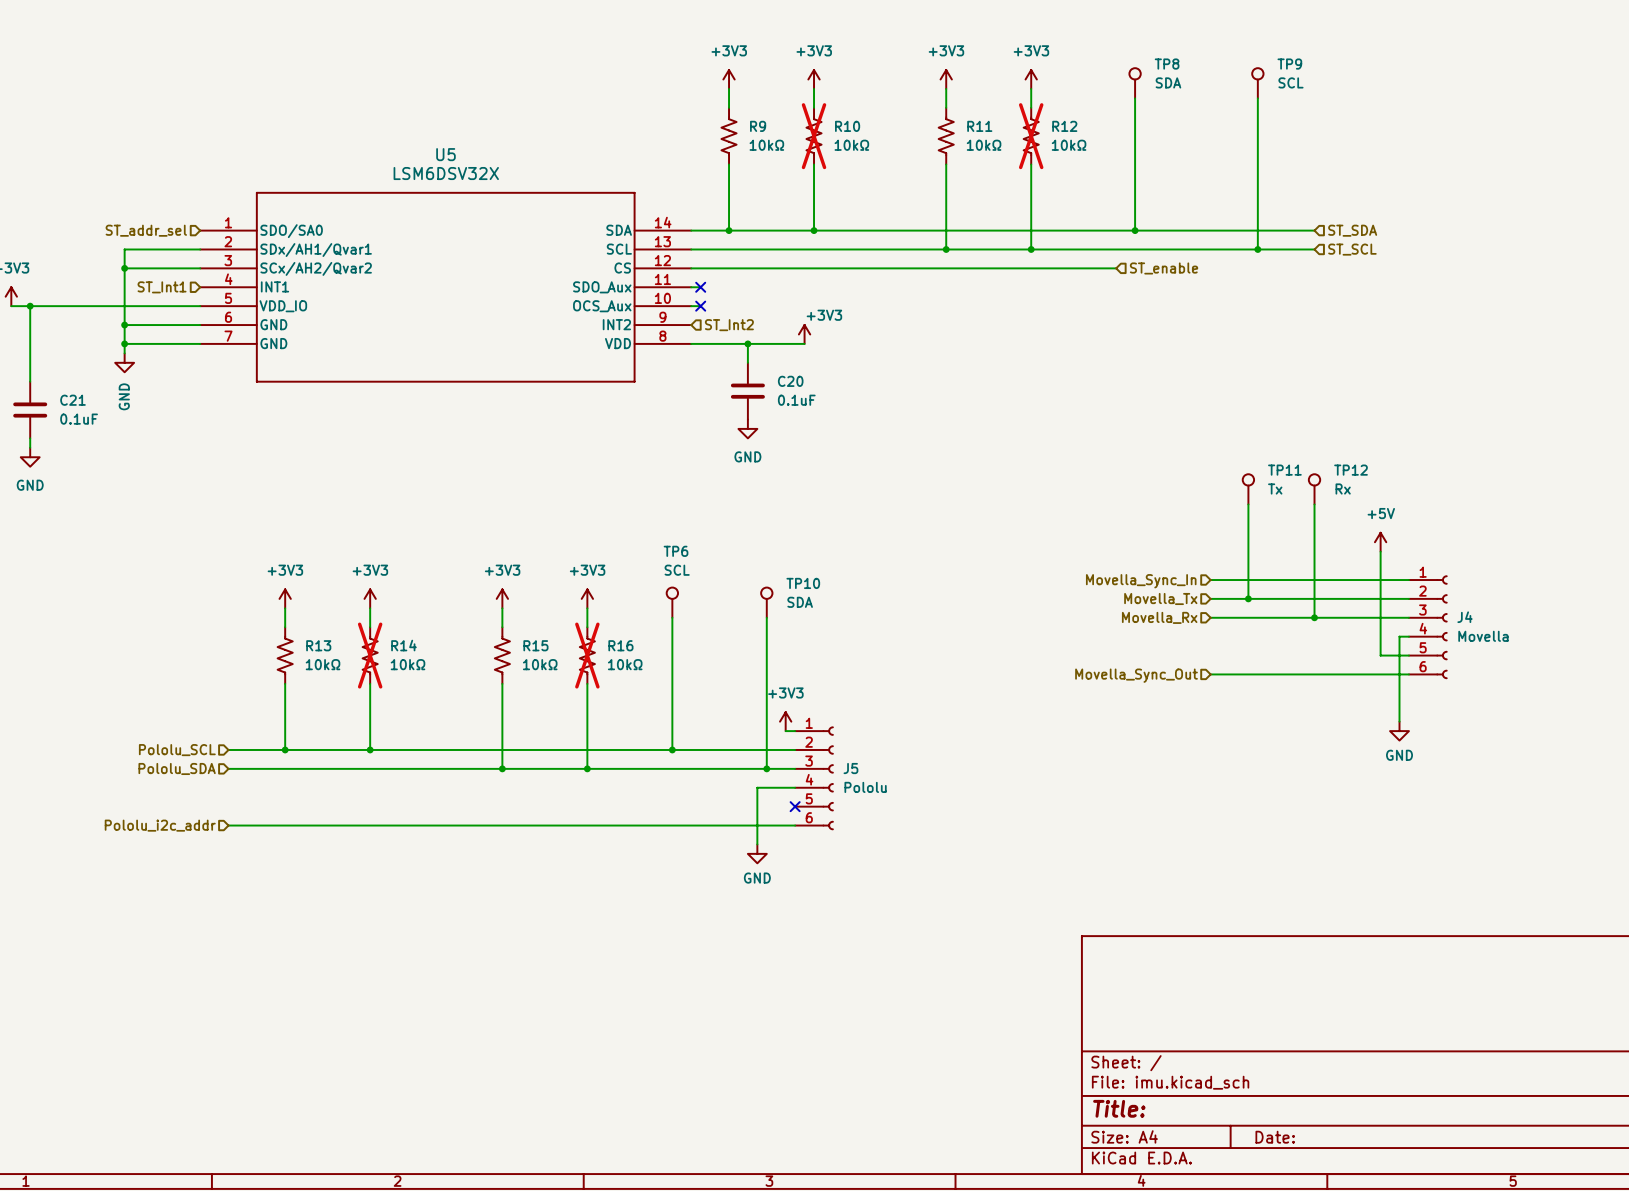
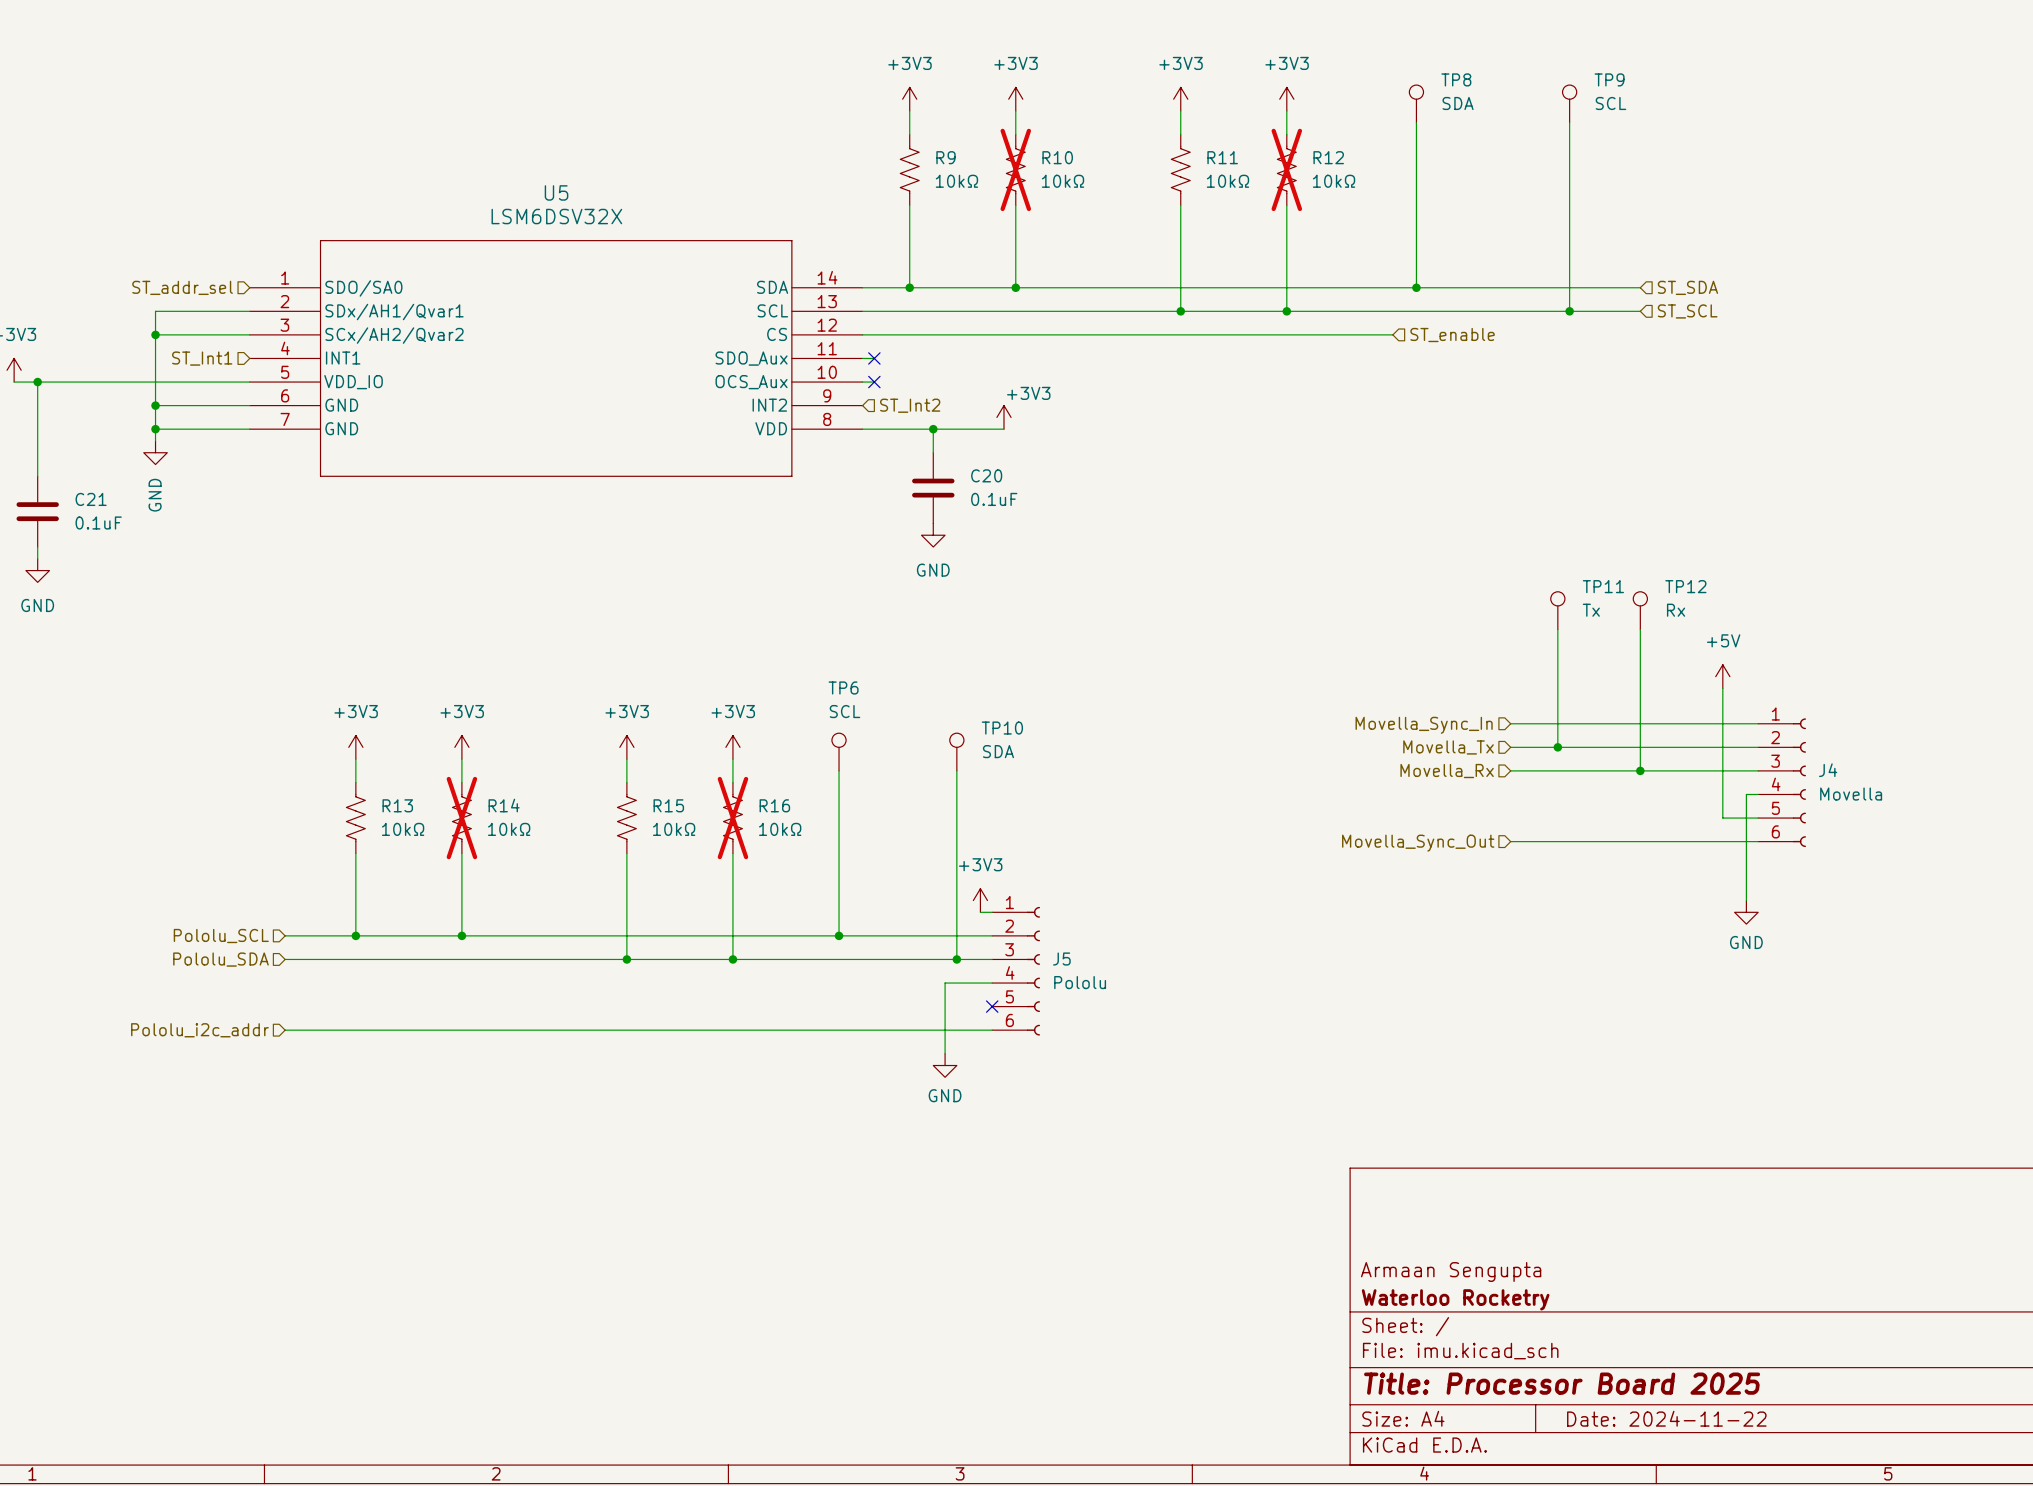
title block: none -> Armaan Sengupta (1451, 1272)
title block: none -> Waterloo Rocketry (1455, 1299)
title block: Title: (1119, 1108) -> Title: Processor Board 2025 (1562, 1383)
title block: Date: (1275, 1137) -> Date: 2024-11-22 (1666, 1418)

